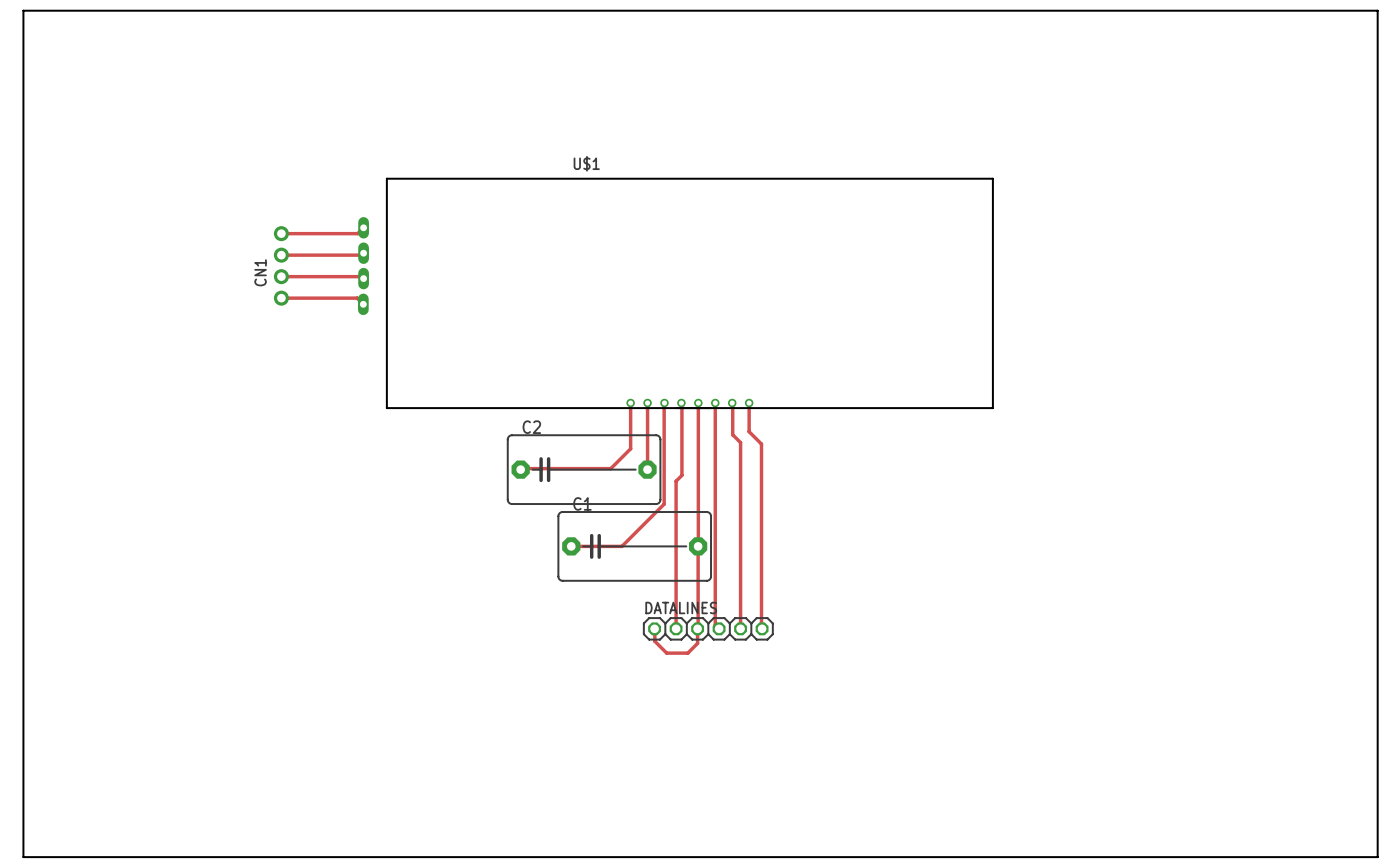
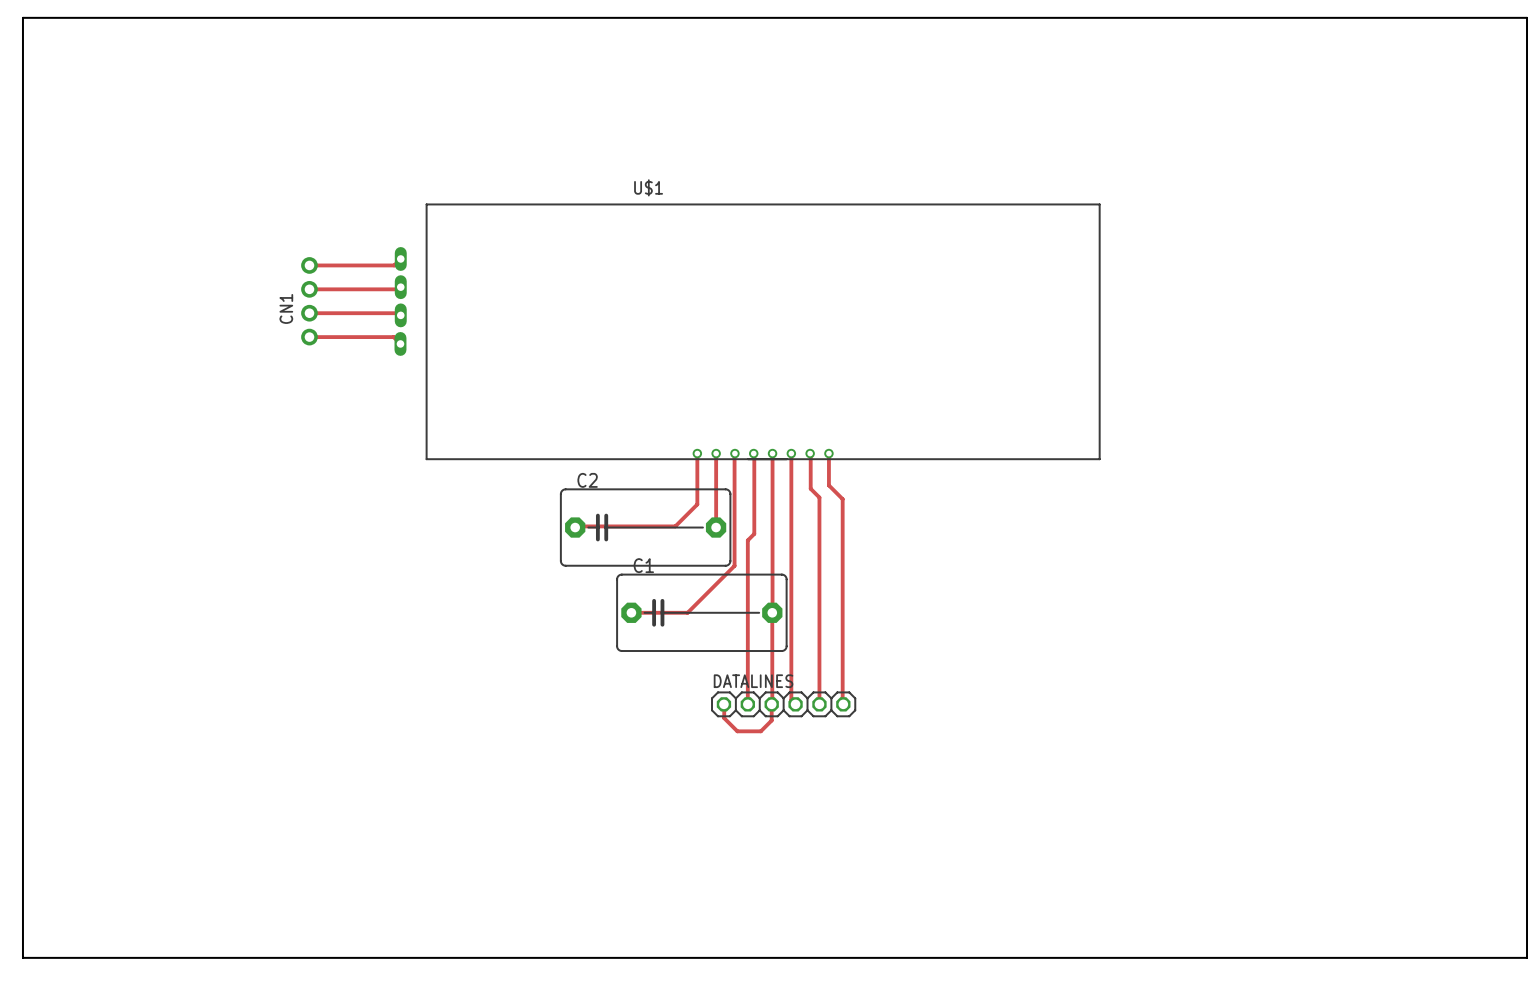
U$1 footprint: [357, 178, 994, 409] -> [394, 203, 1101, 460]

